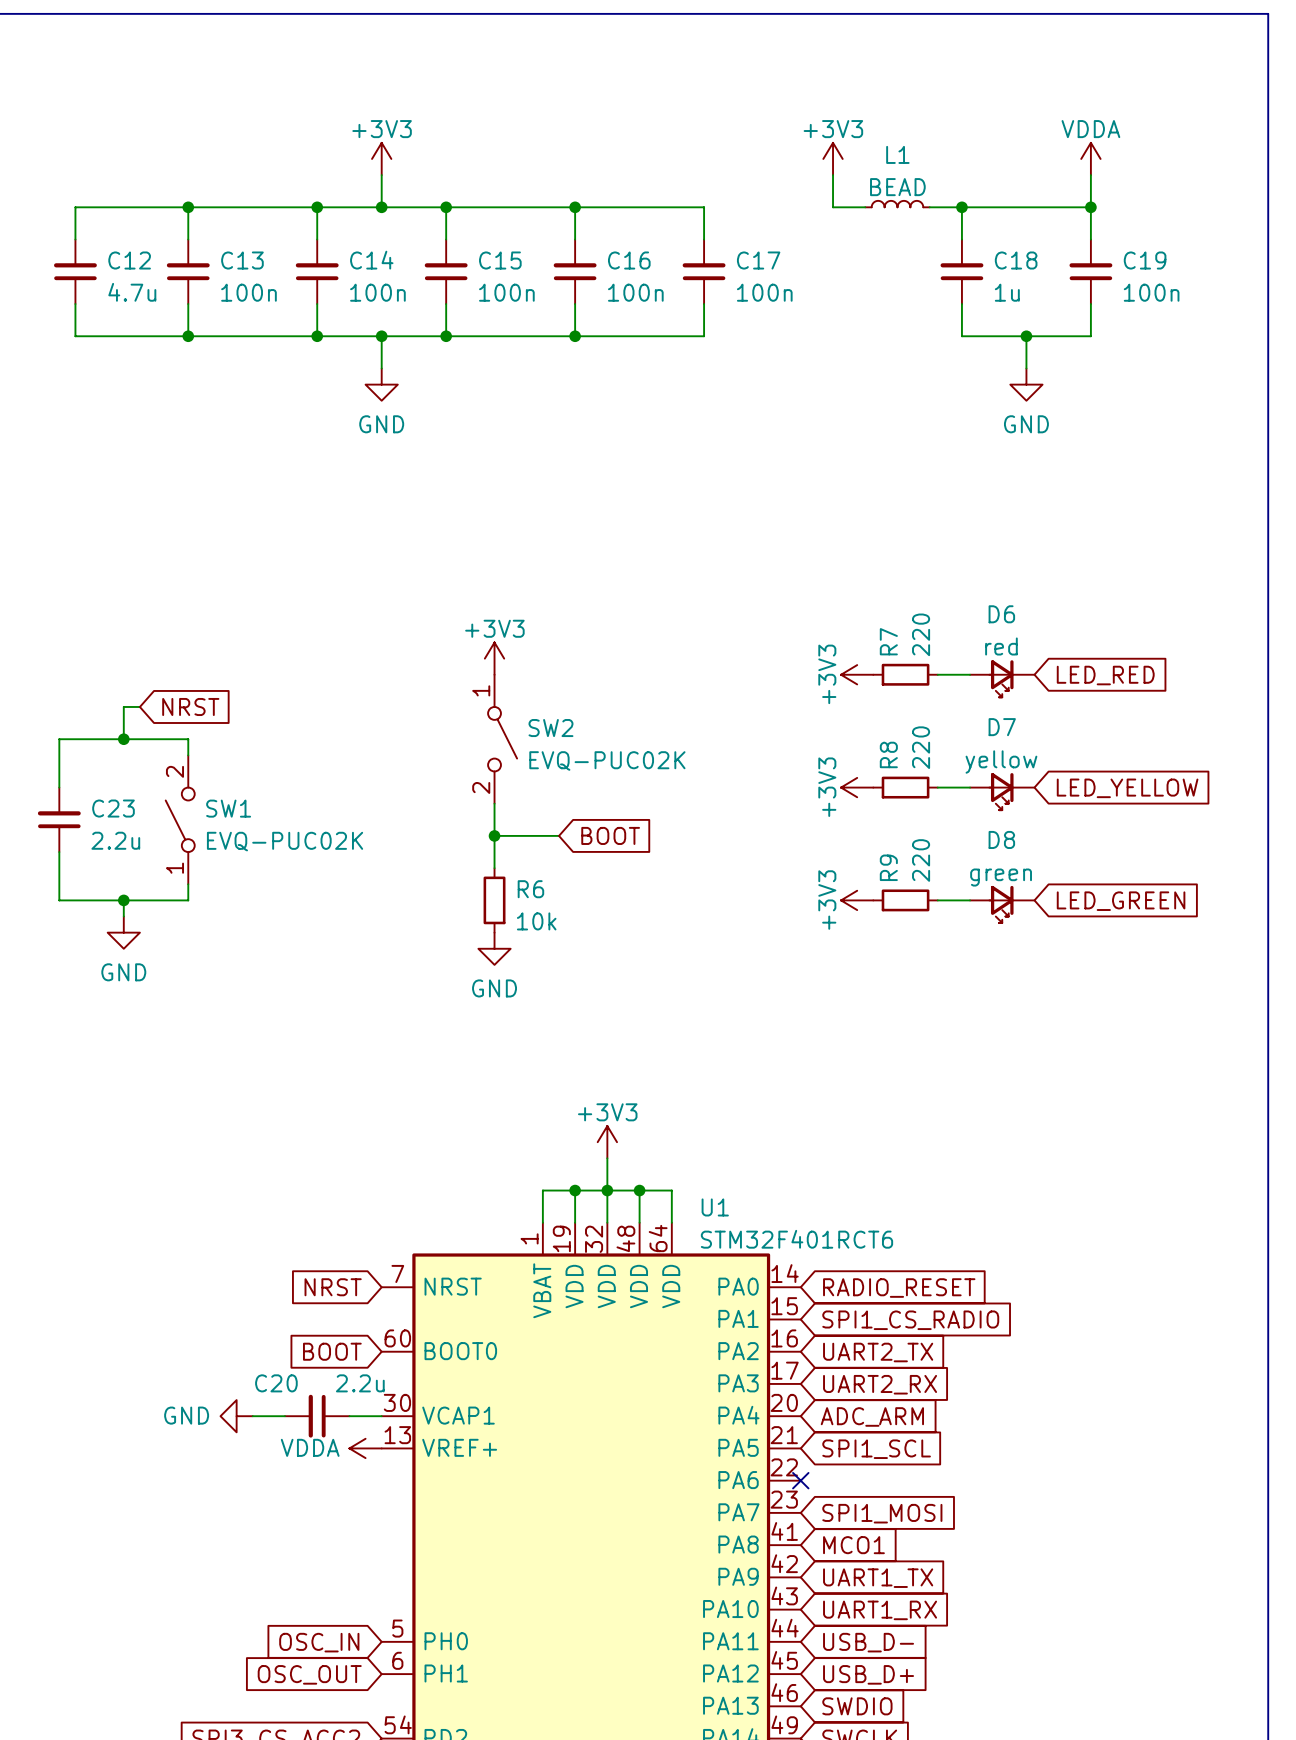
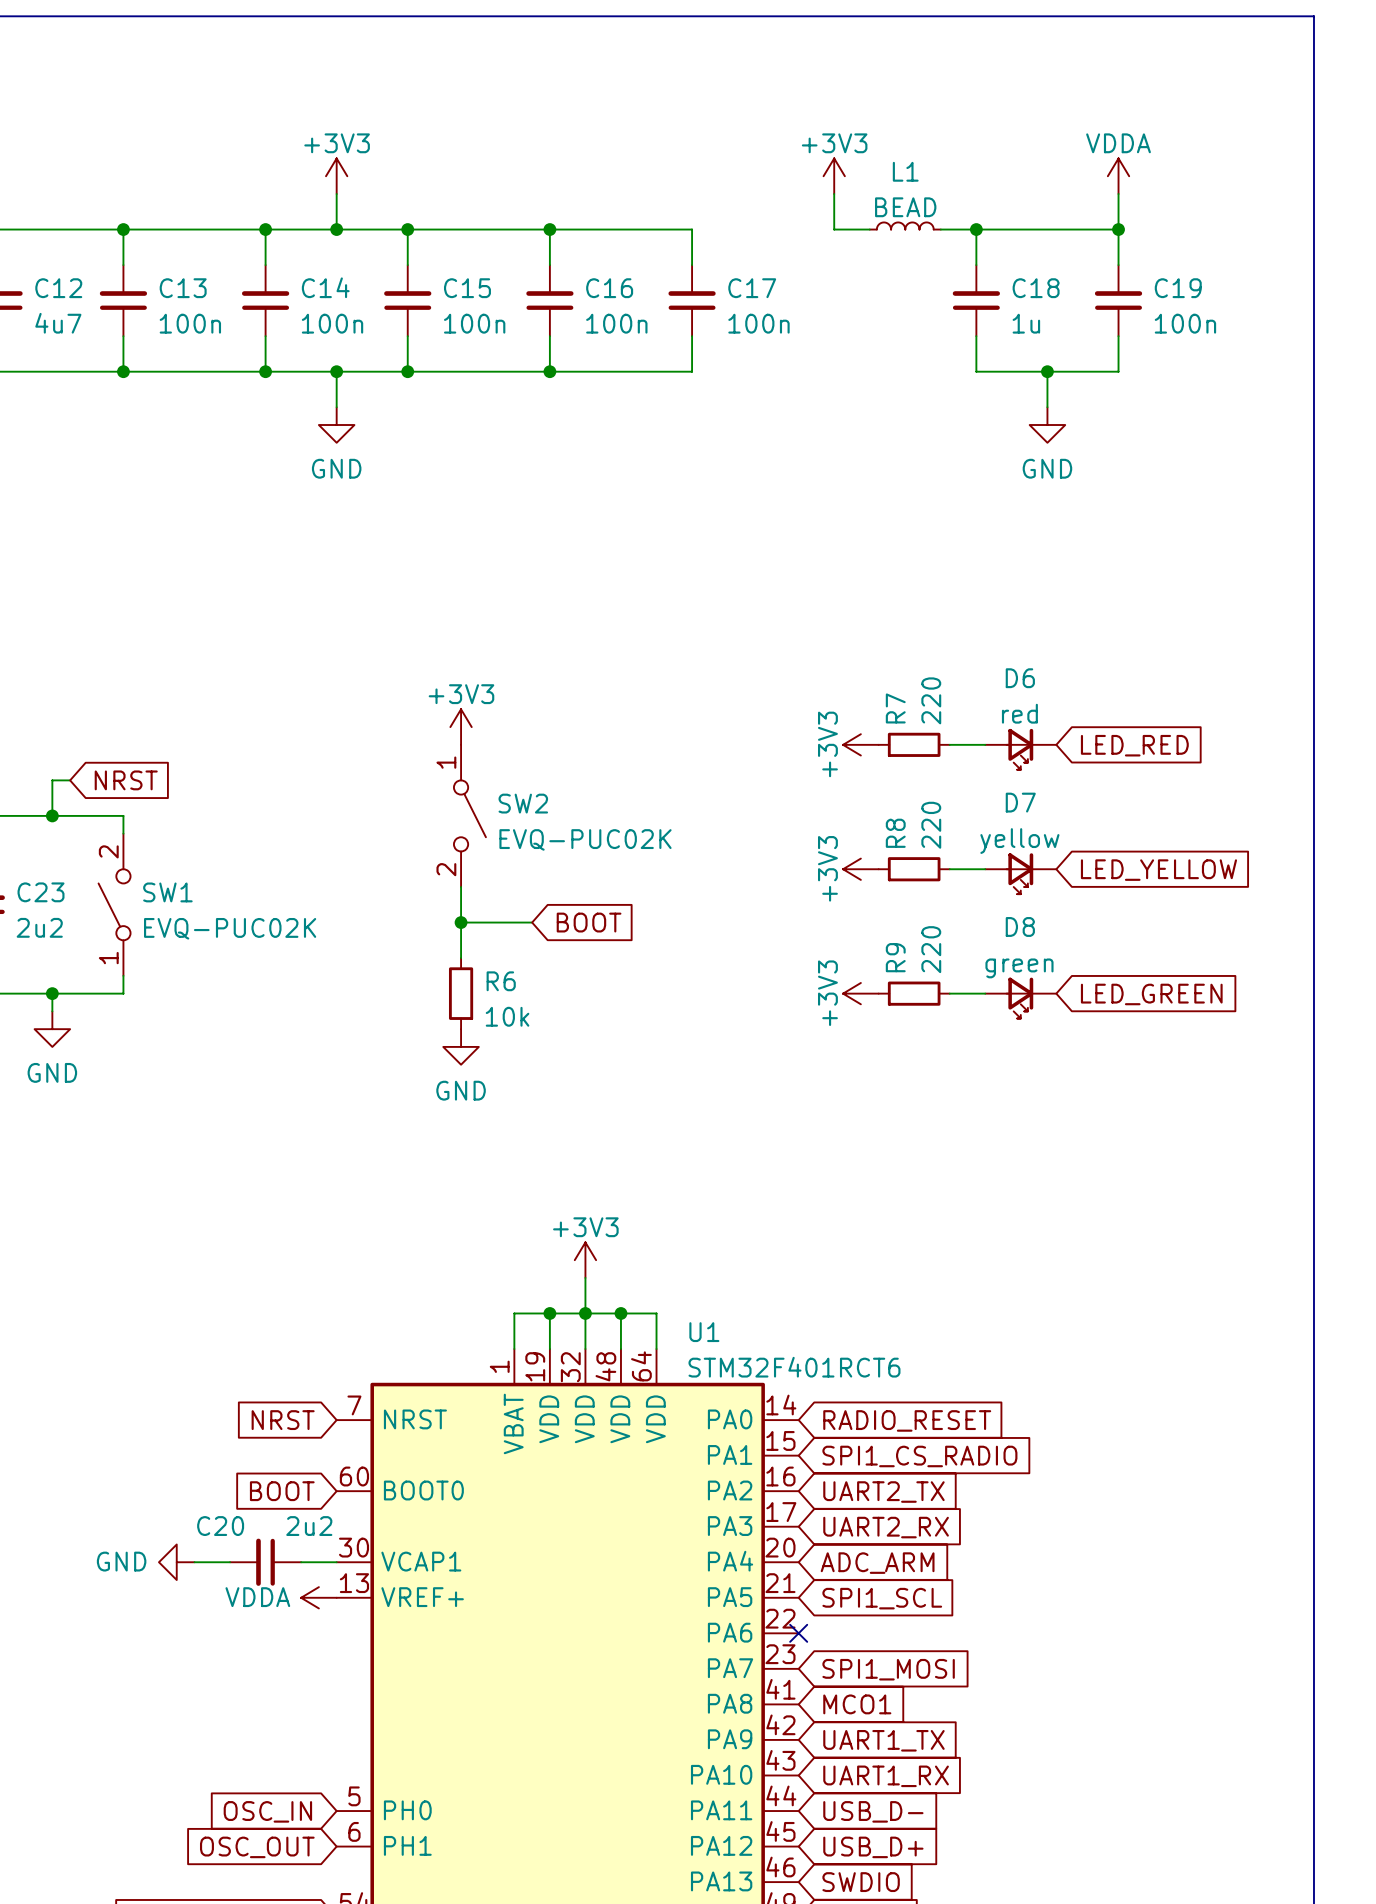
C12 value: 4.7u (132, 292) -> 4u7 (58, 323)
C23 value: 2.2u (115, 840) -> 2u2 (39, 927)
C20 value: 2.2u (360, 1383) -> 2u2 (309, 1526)

